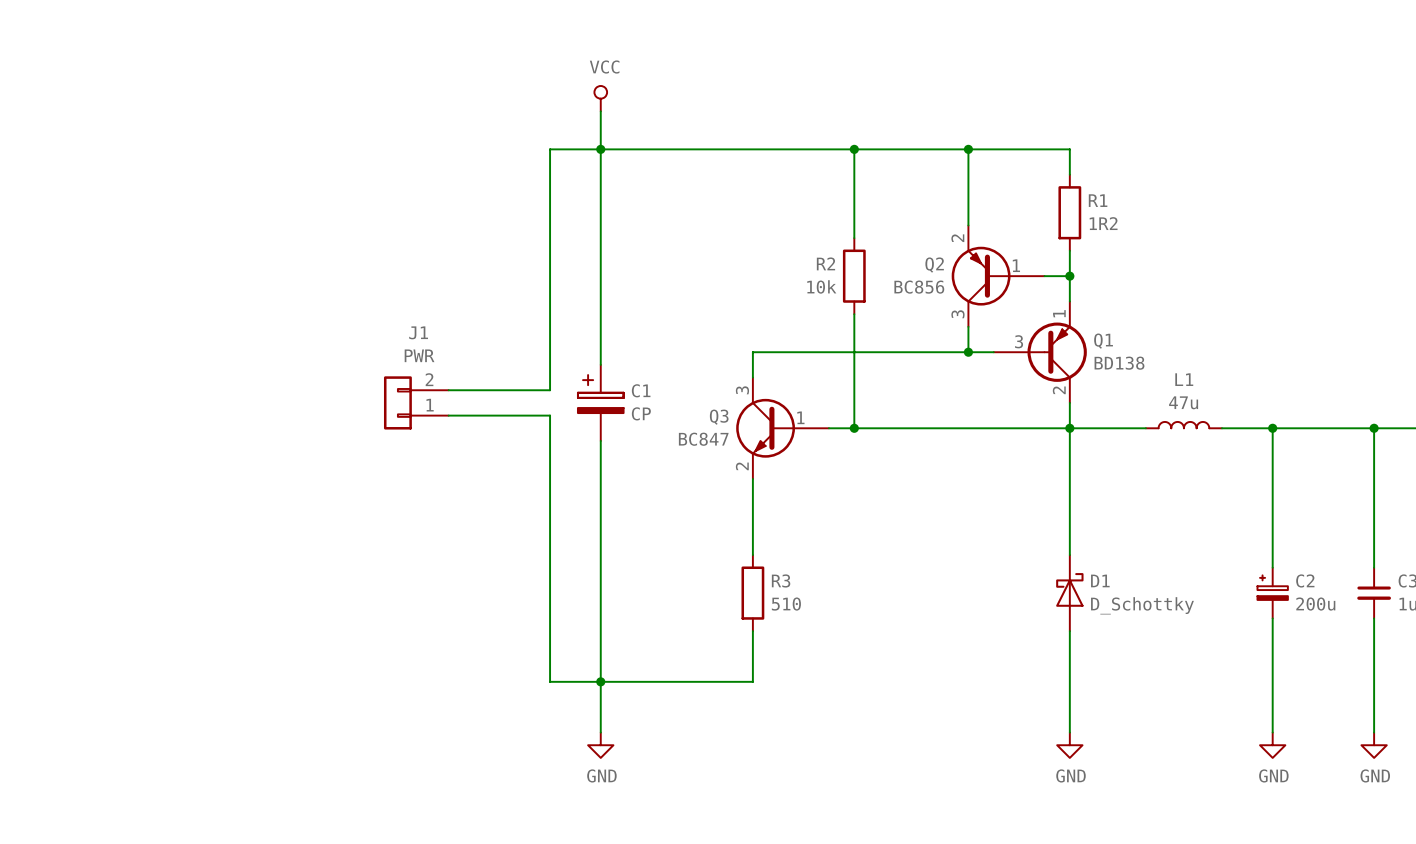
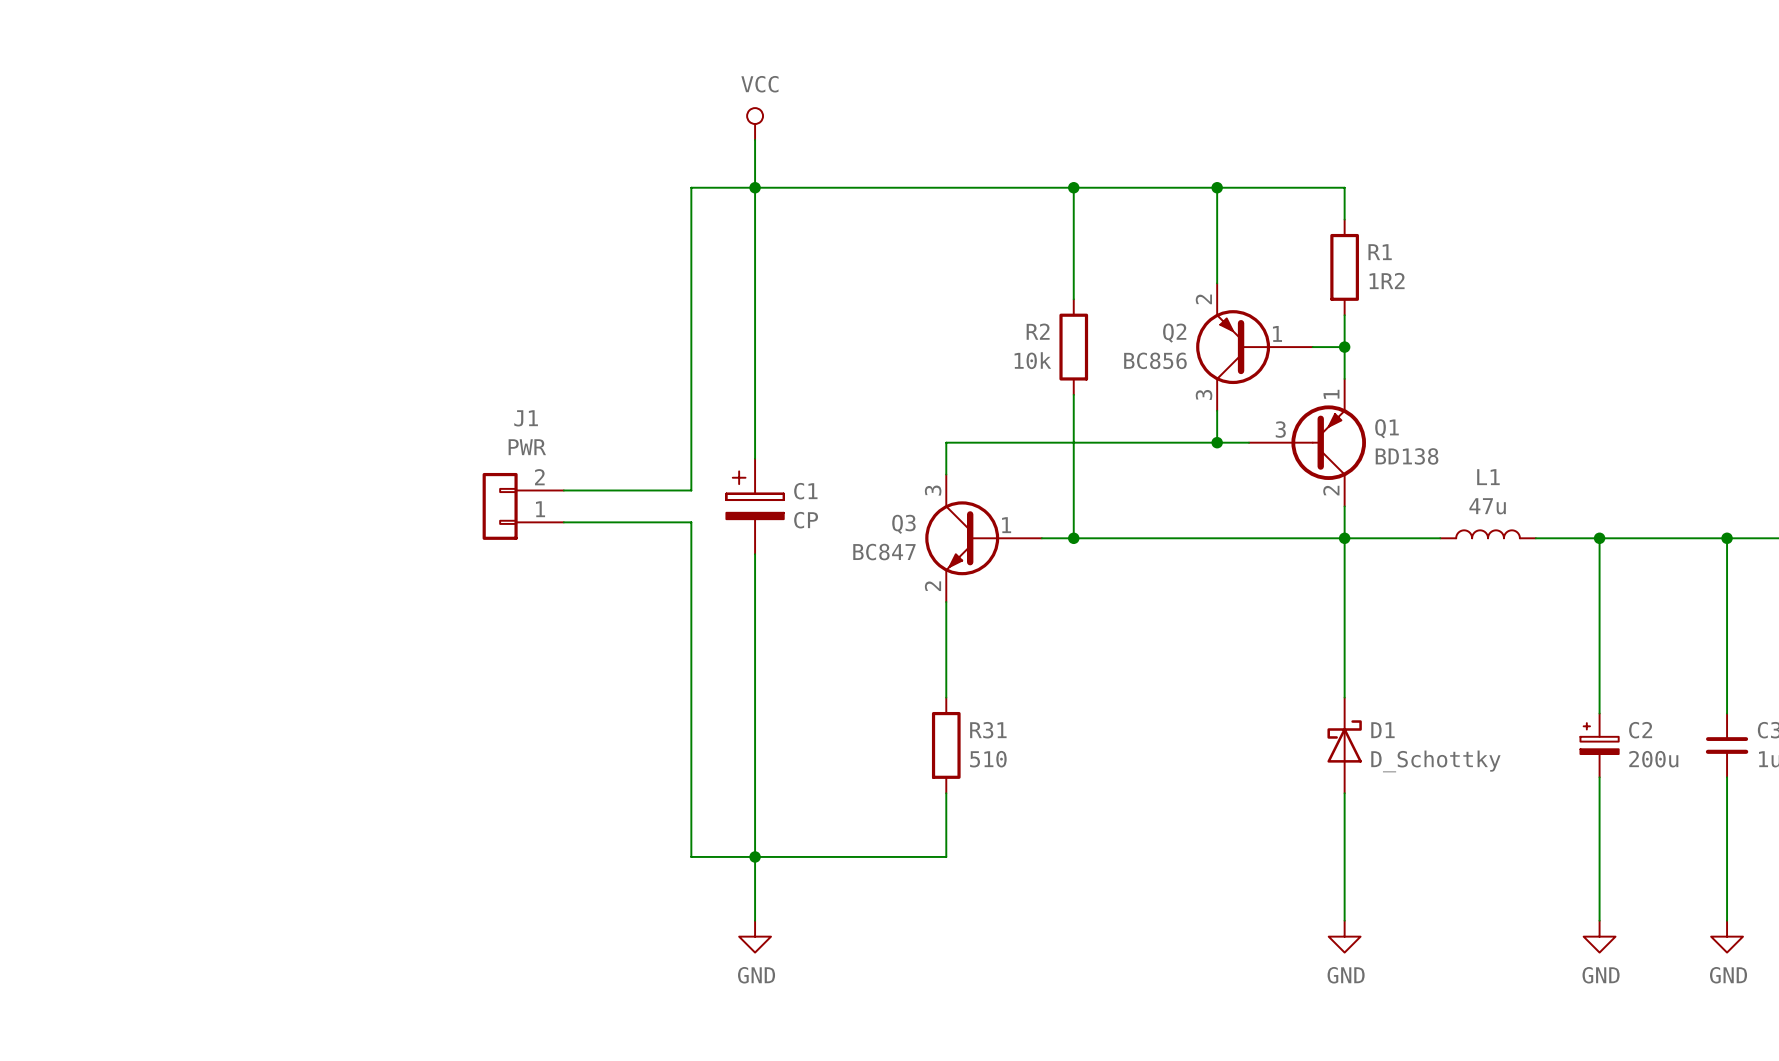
R3 name: R3 (781, 580) -> R31 (988, 730)

